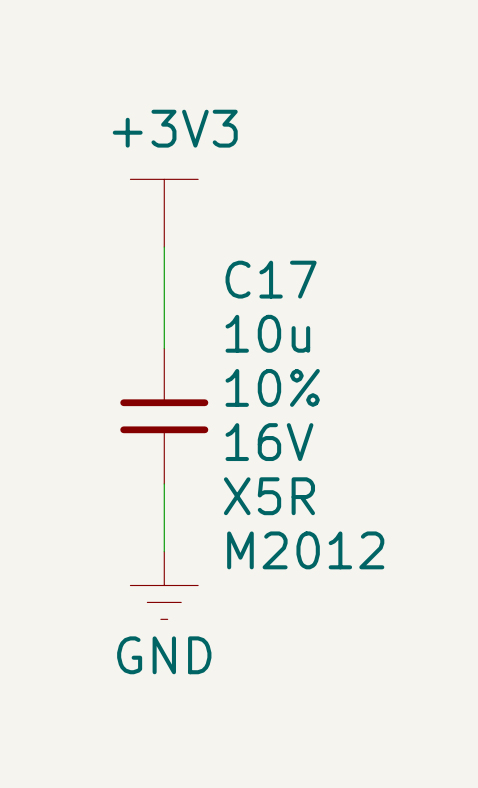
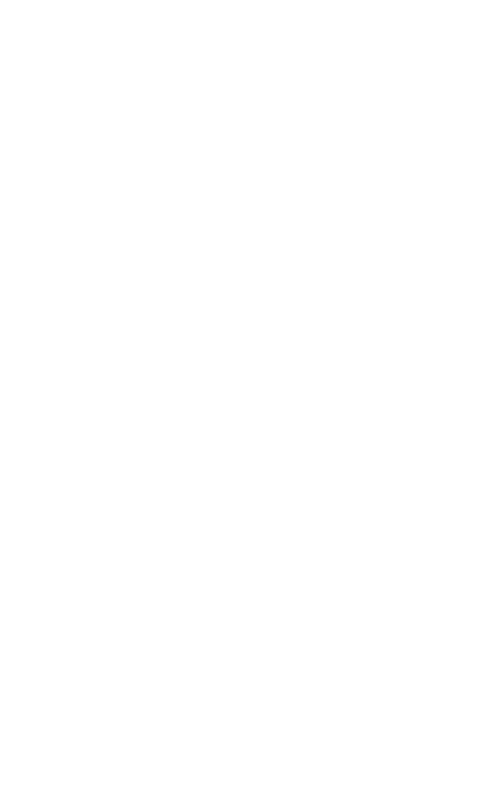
power symbol: +3V3 (164, 213) -> none
wire: (164, 247) (164, 348) -> none
C17: 10u (164, 416) -> none
wire: (164, 483) (164, 551) -> none
power symbol: GND (164, 585) -> none

